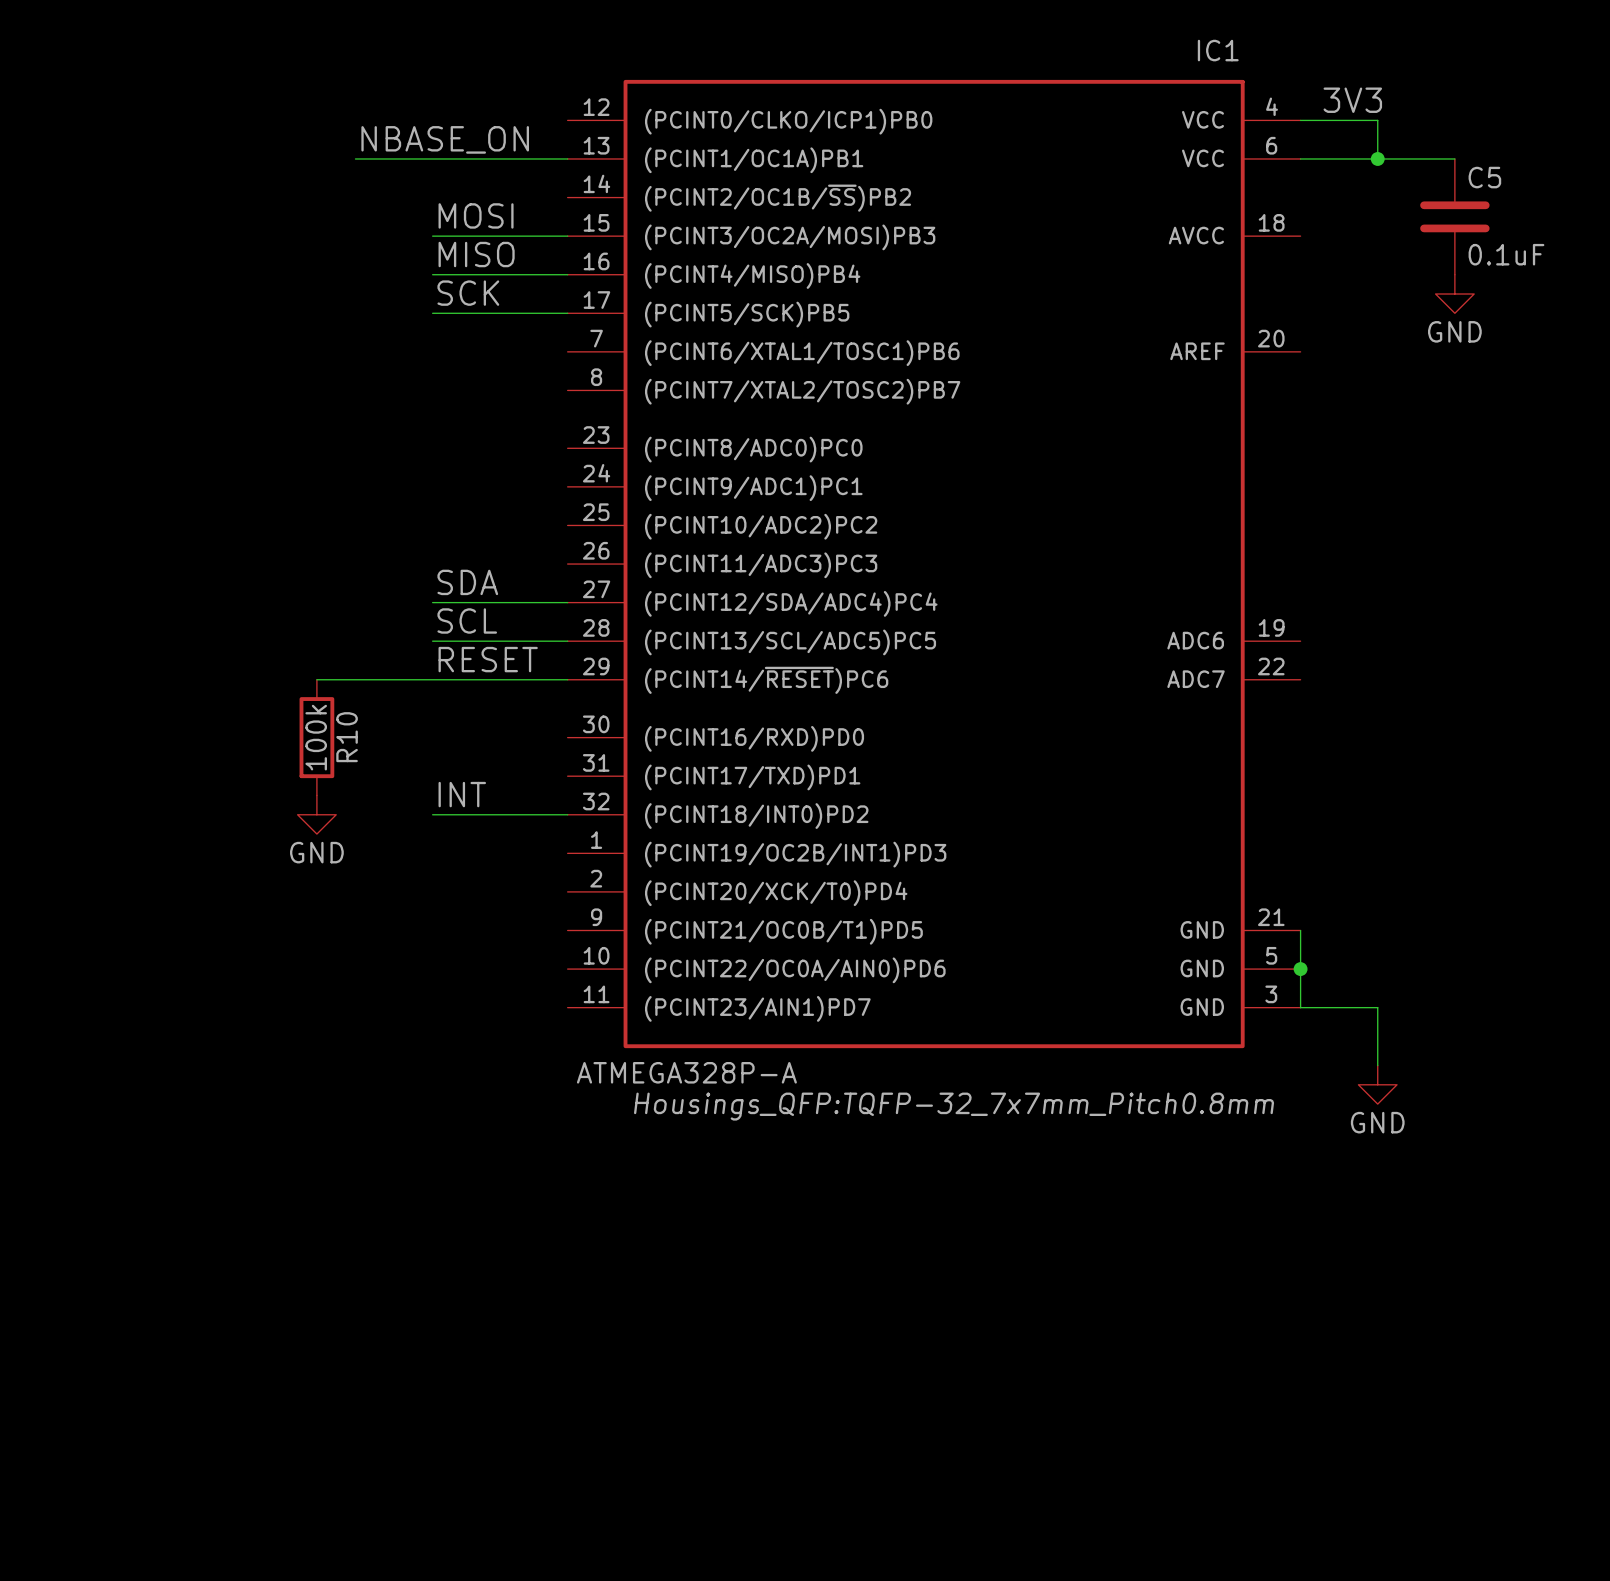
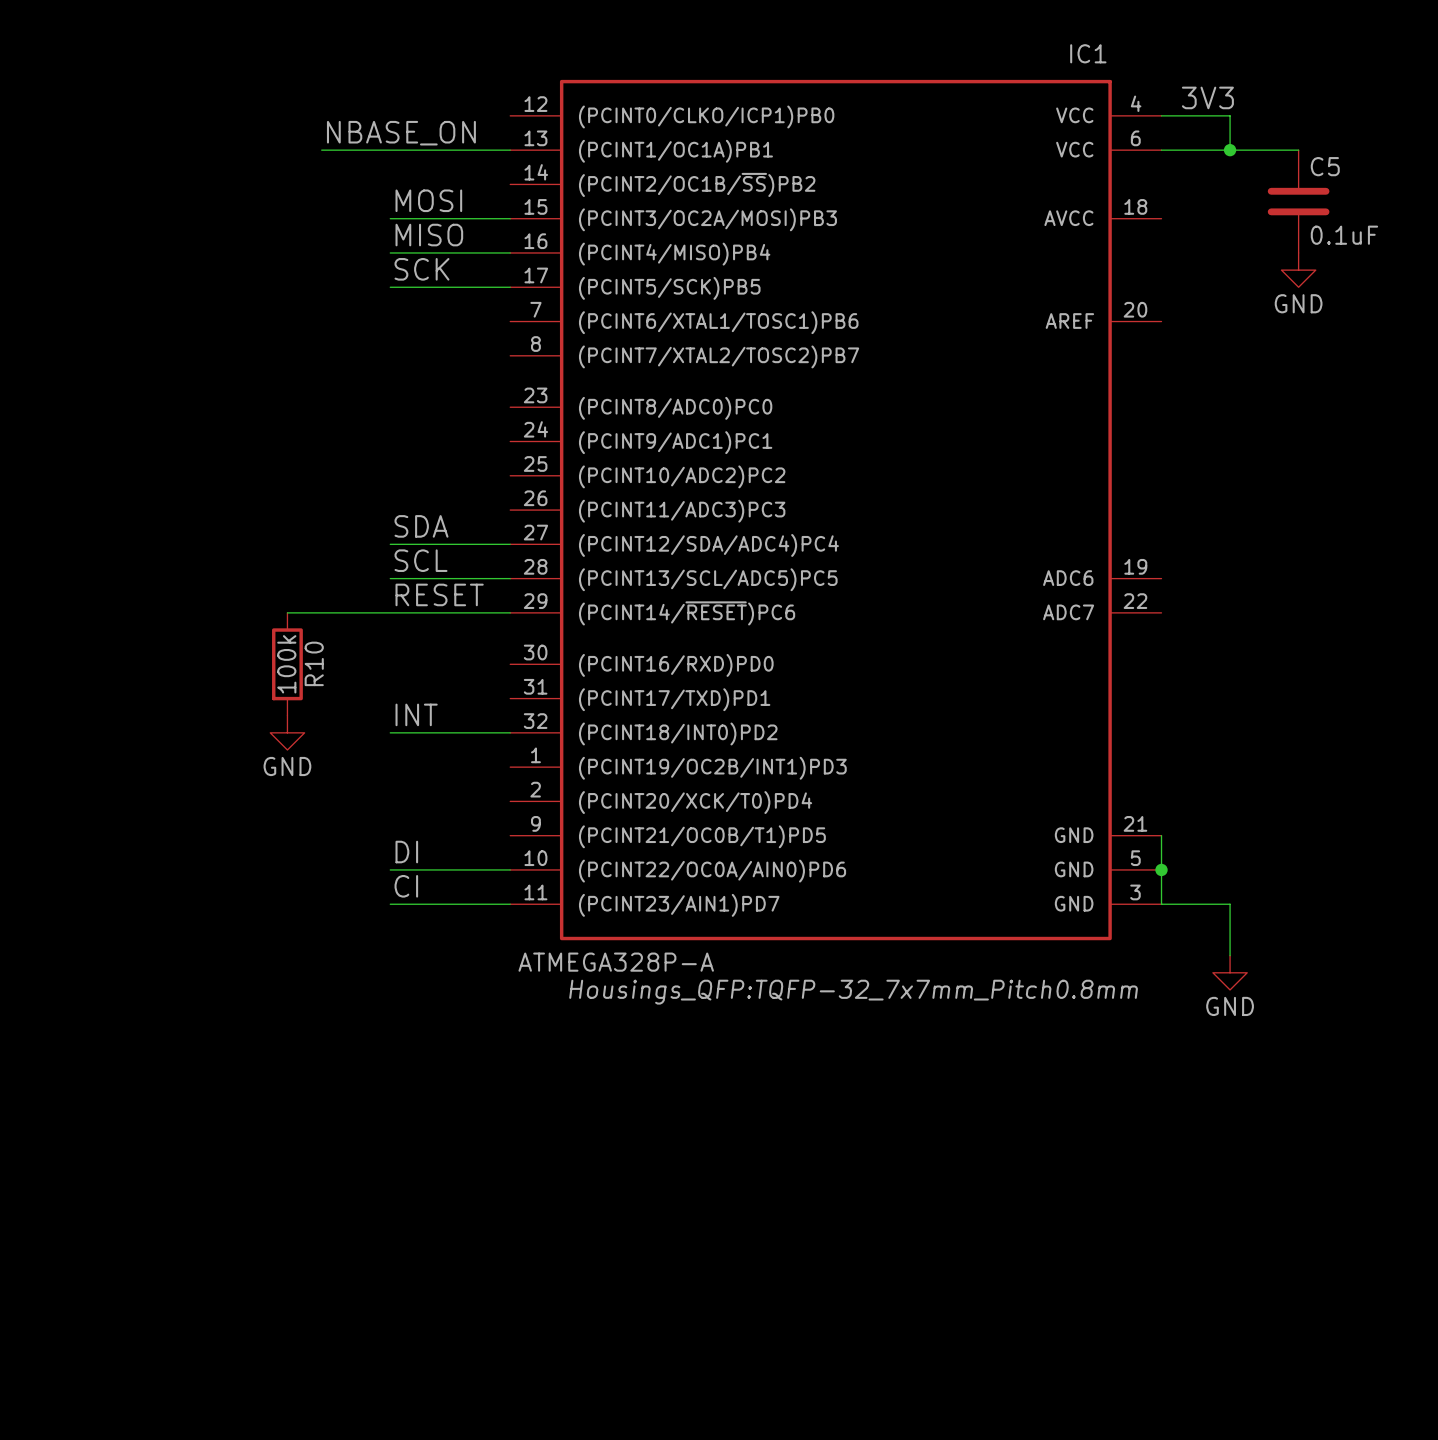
label: none -> DI (406, 852)
wire: none -> (390, 869) (510, 869)
label: none -> CI (406, 886)
wire: none -> (390, 904) (510, 904)

